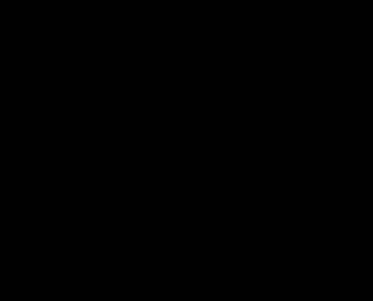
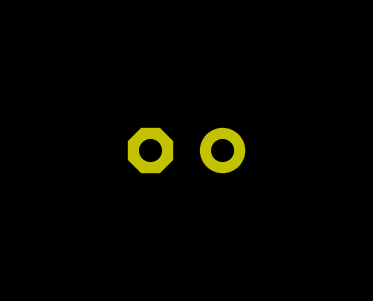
part: none -> (186, 150)

